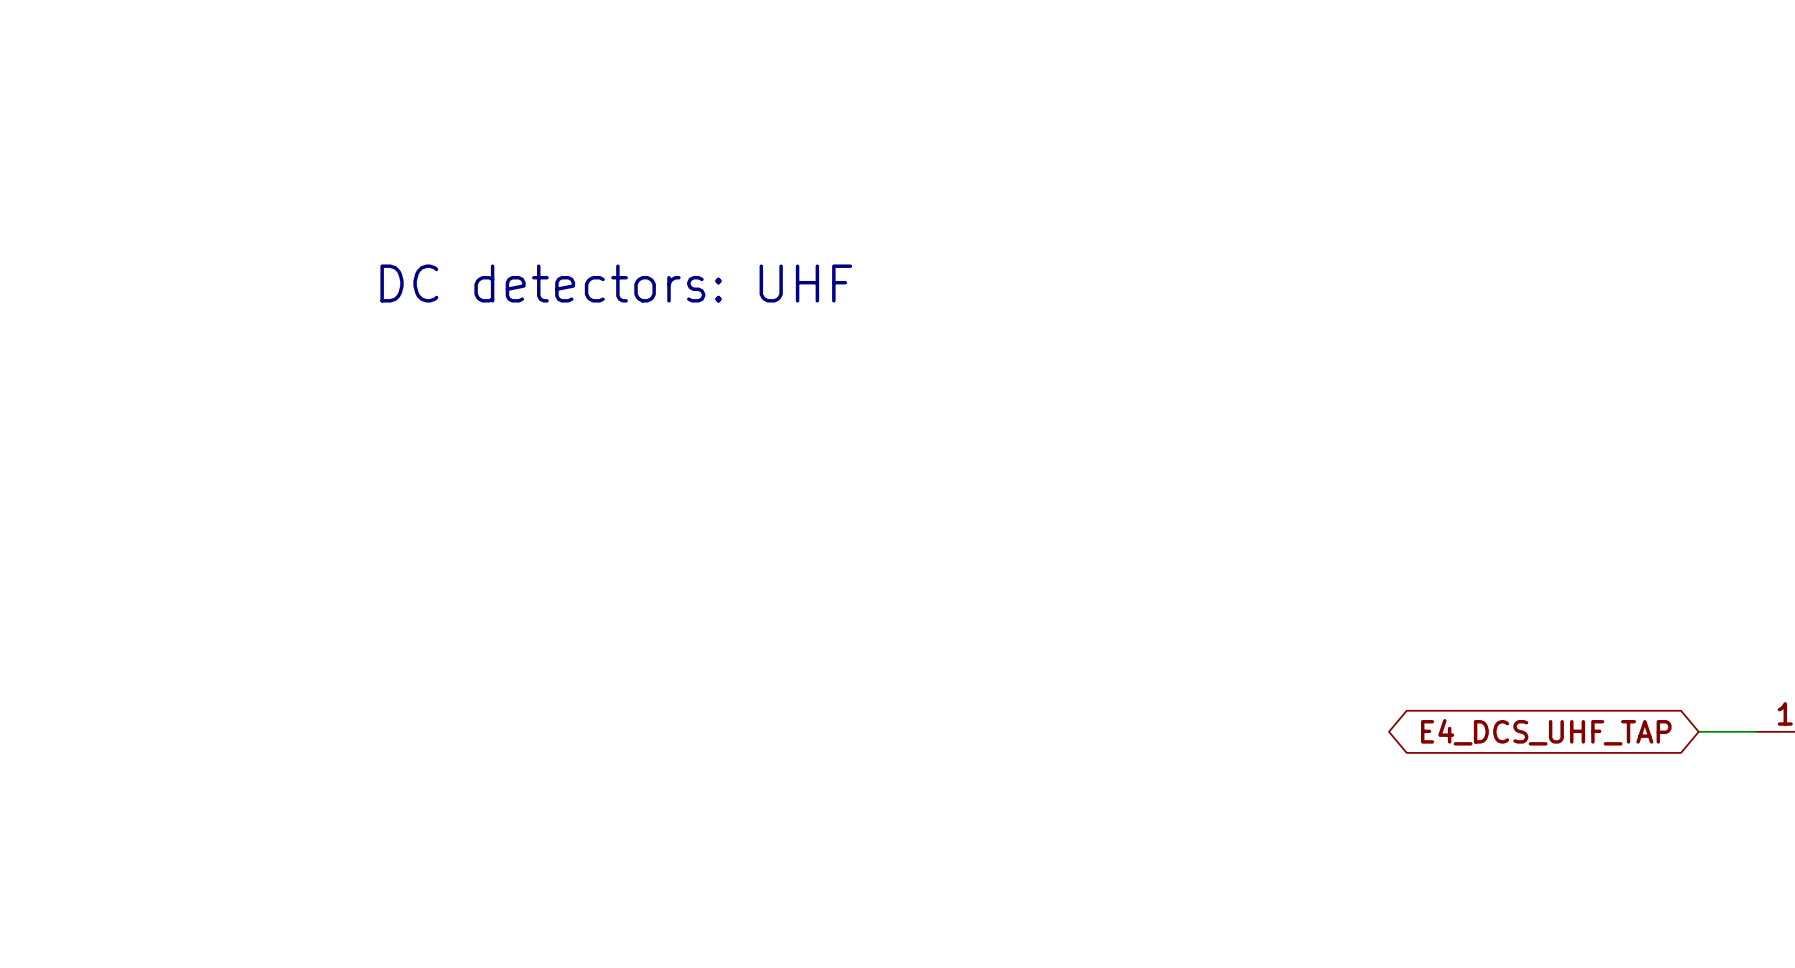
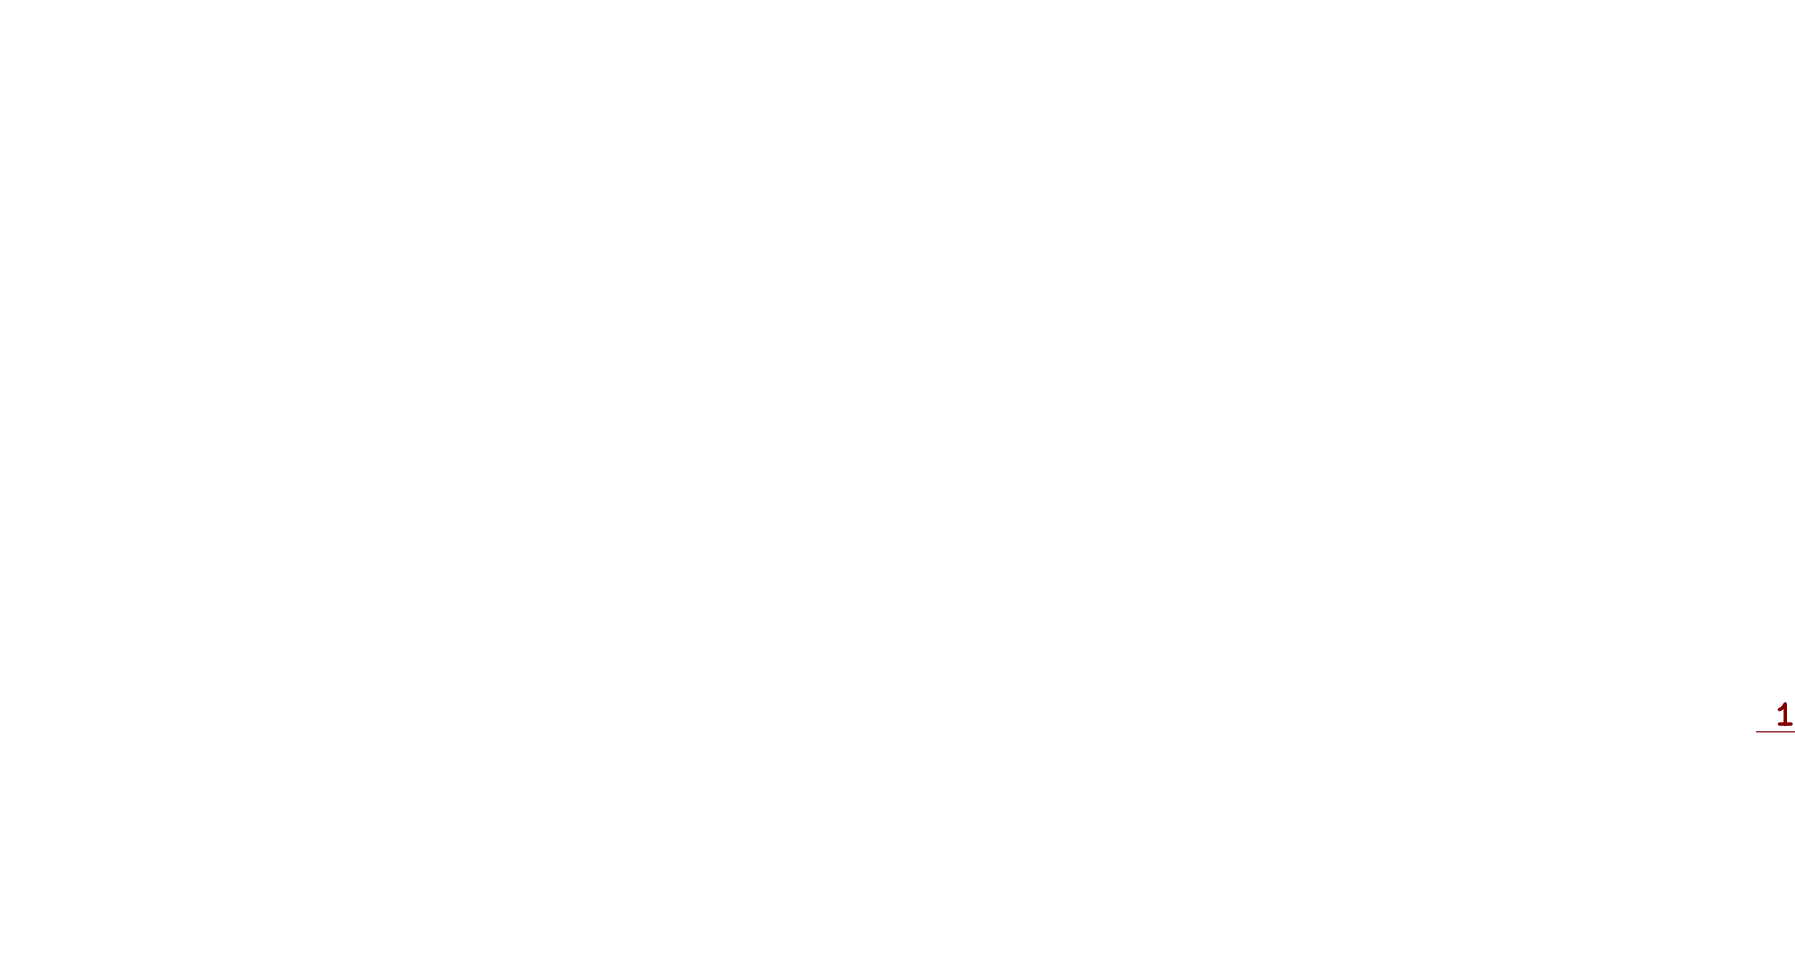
text: DC detectors: UHF (616, 283) -> none
wire: (1698, 731) (1756, 731) -> none
global label: E4_DCS_UHF_TAP (1546, 732) -> none

